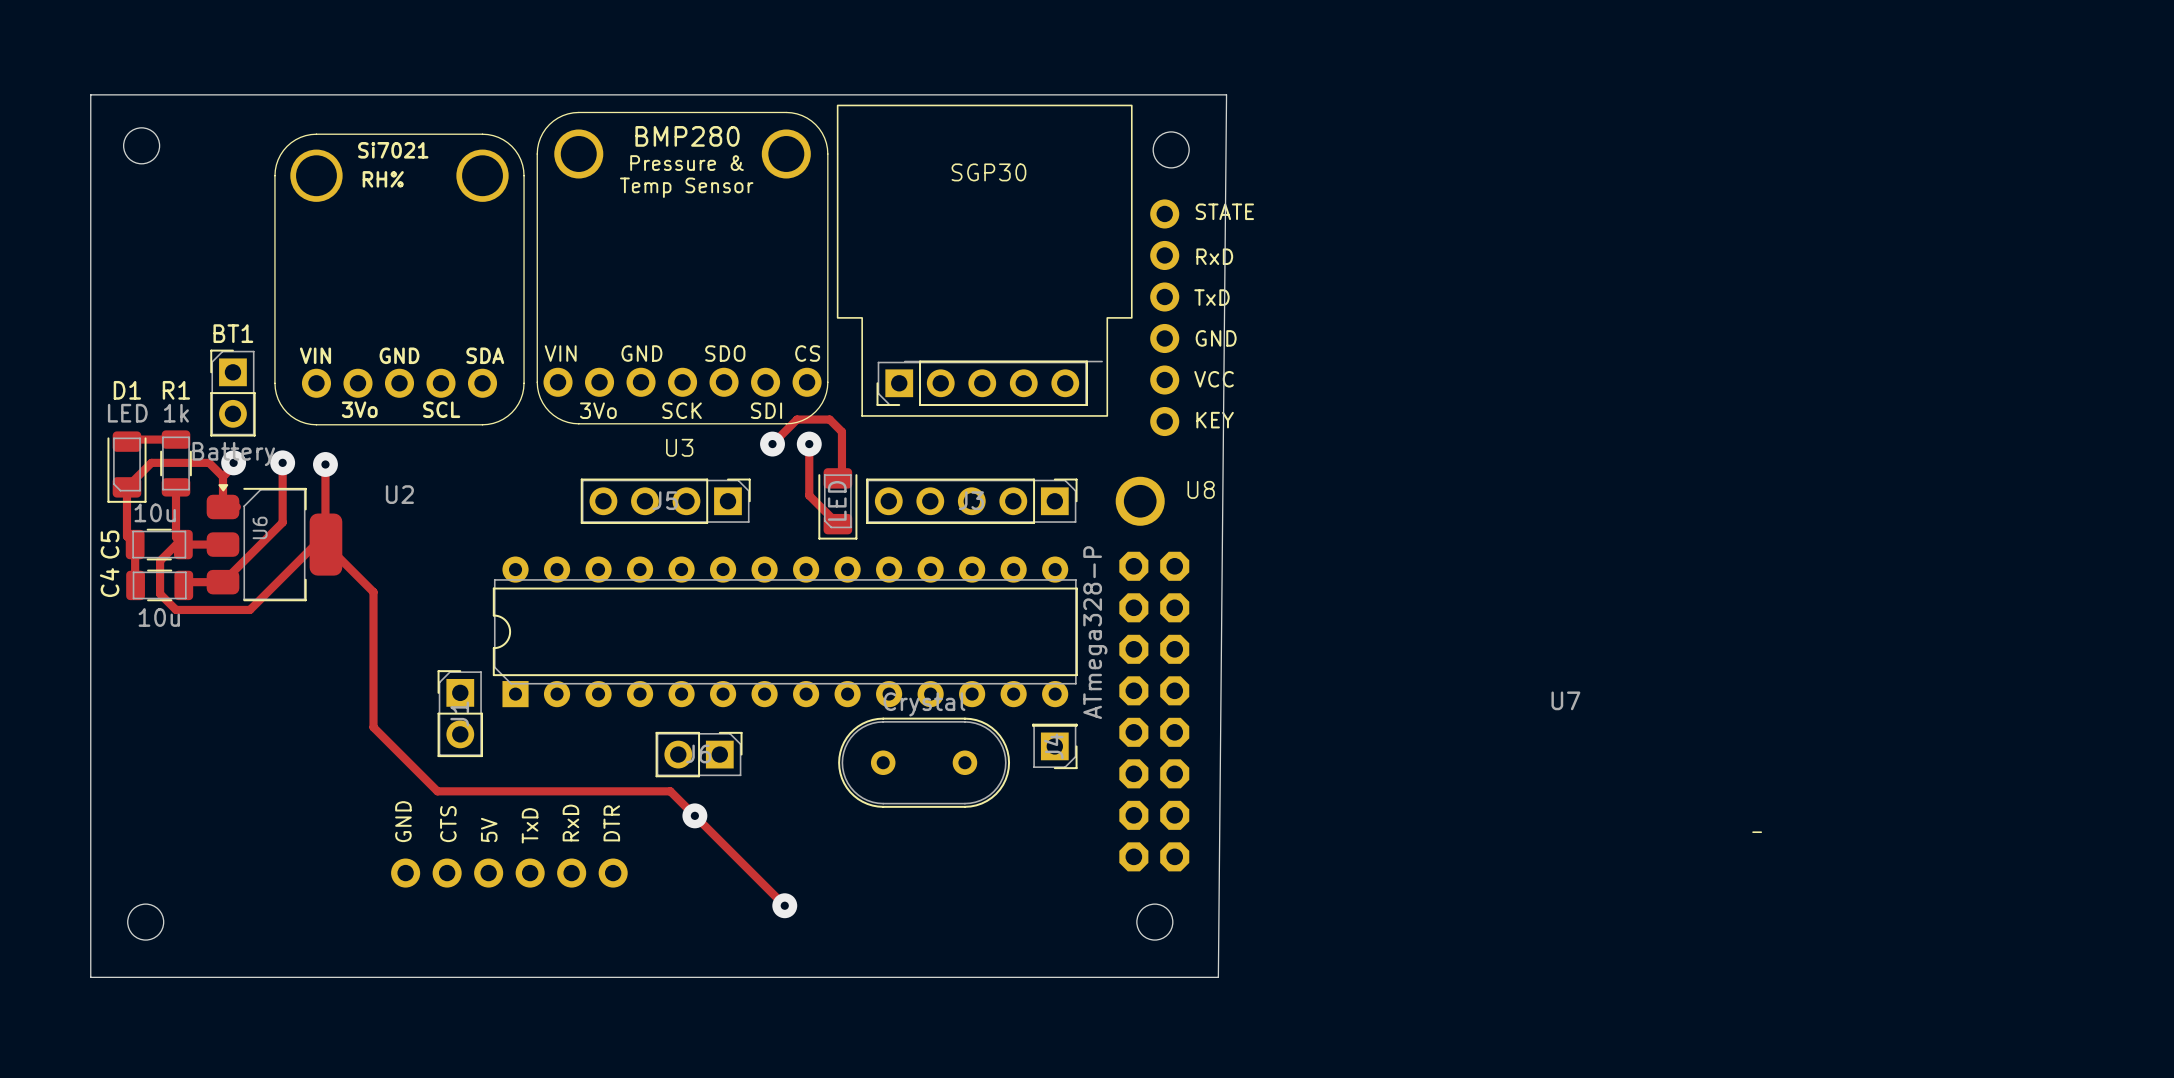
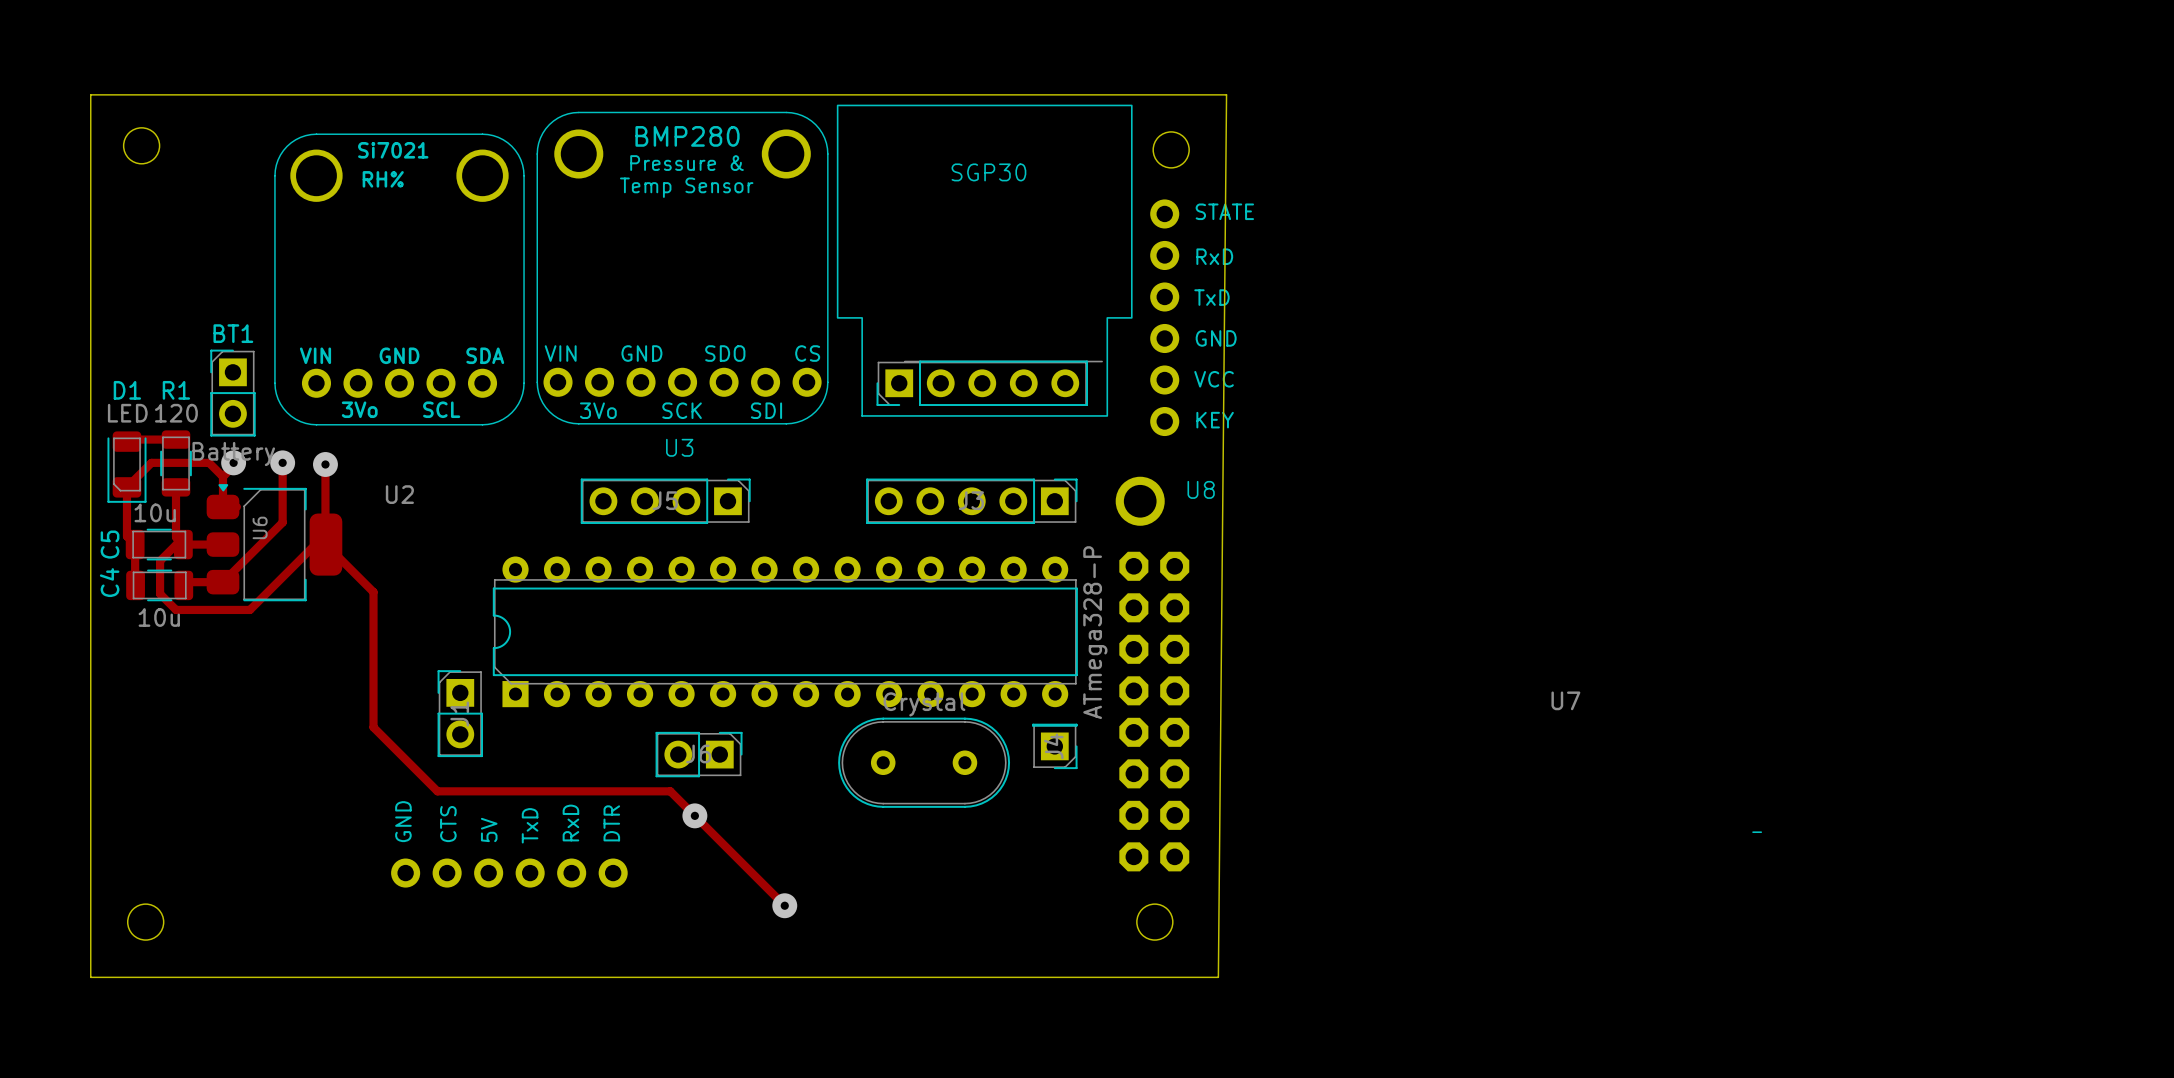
R1 value: 1k (176, 413) -> 120 (176, 413)
track: (772, 444) (797, 419) (829, 419) (841, 431) (841, 474) (837, 478) -> none
via: (772, 444) -> none
track: (809, 444) (809, 495) (837, 524) -> none
via: (809, 444) -> none
part: LED (837, 503) -> none

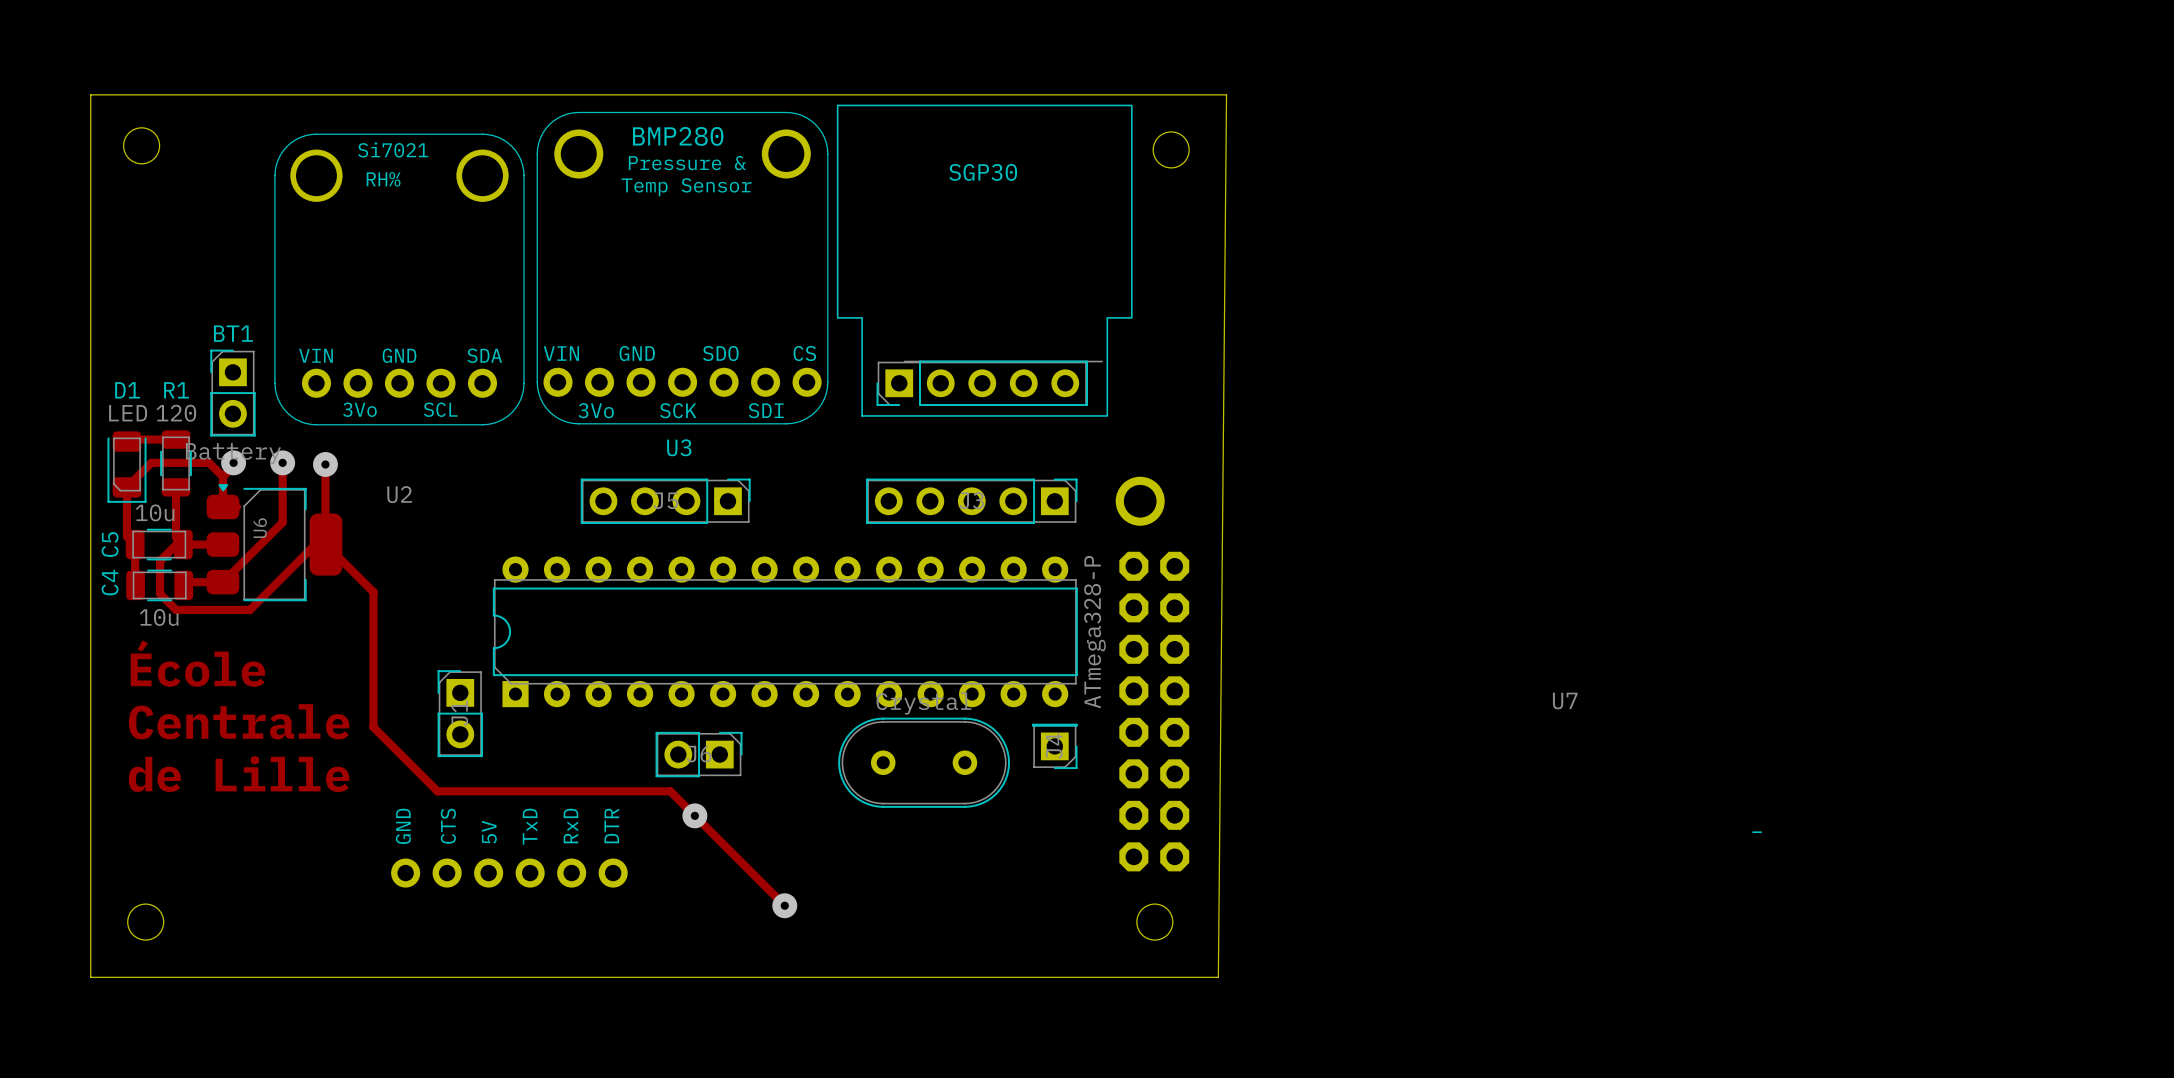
U8: (1164, 317) -> none
text: none -> École (197, 663)
text: none -> Centrale (239, 721)
text: none -> de Lille (239, 774)

